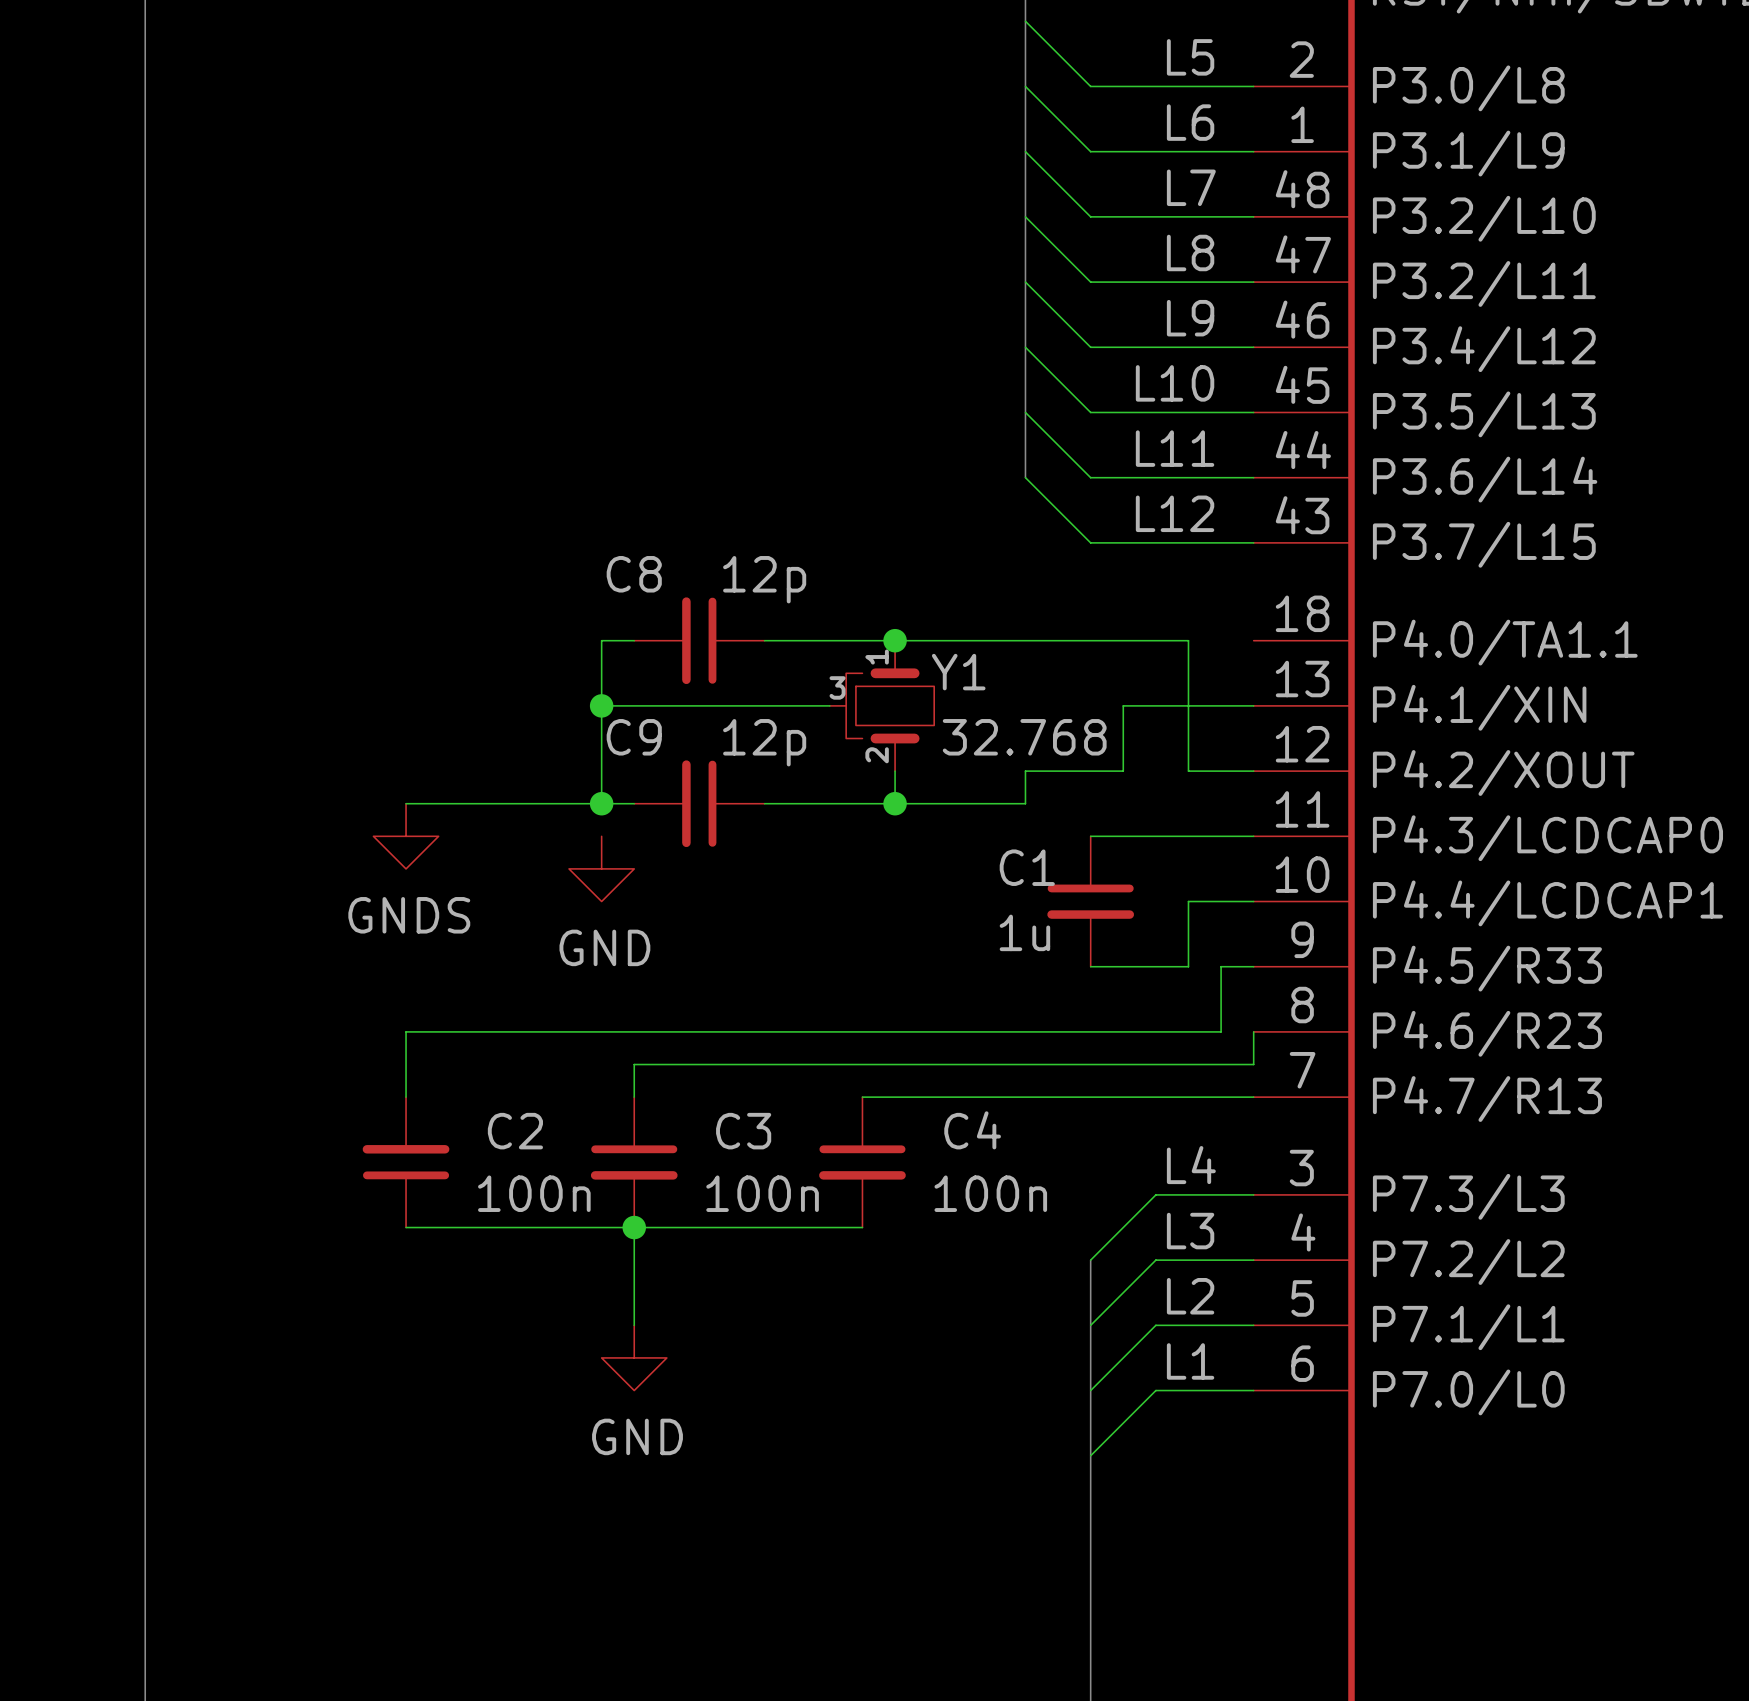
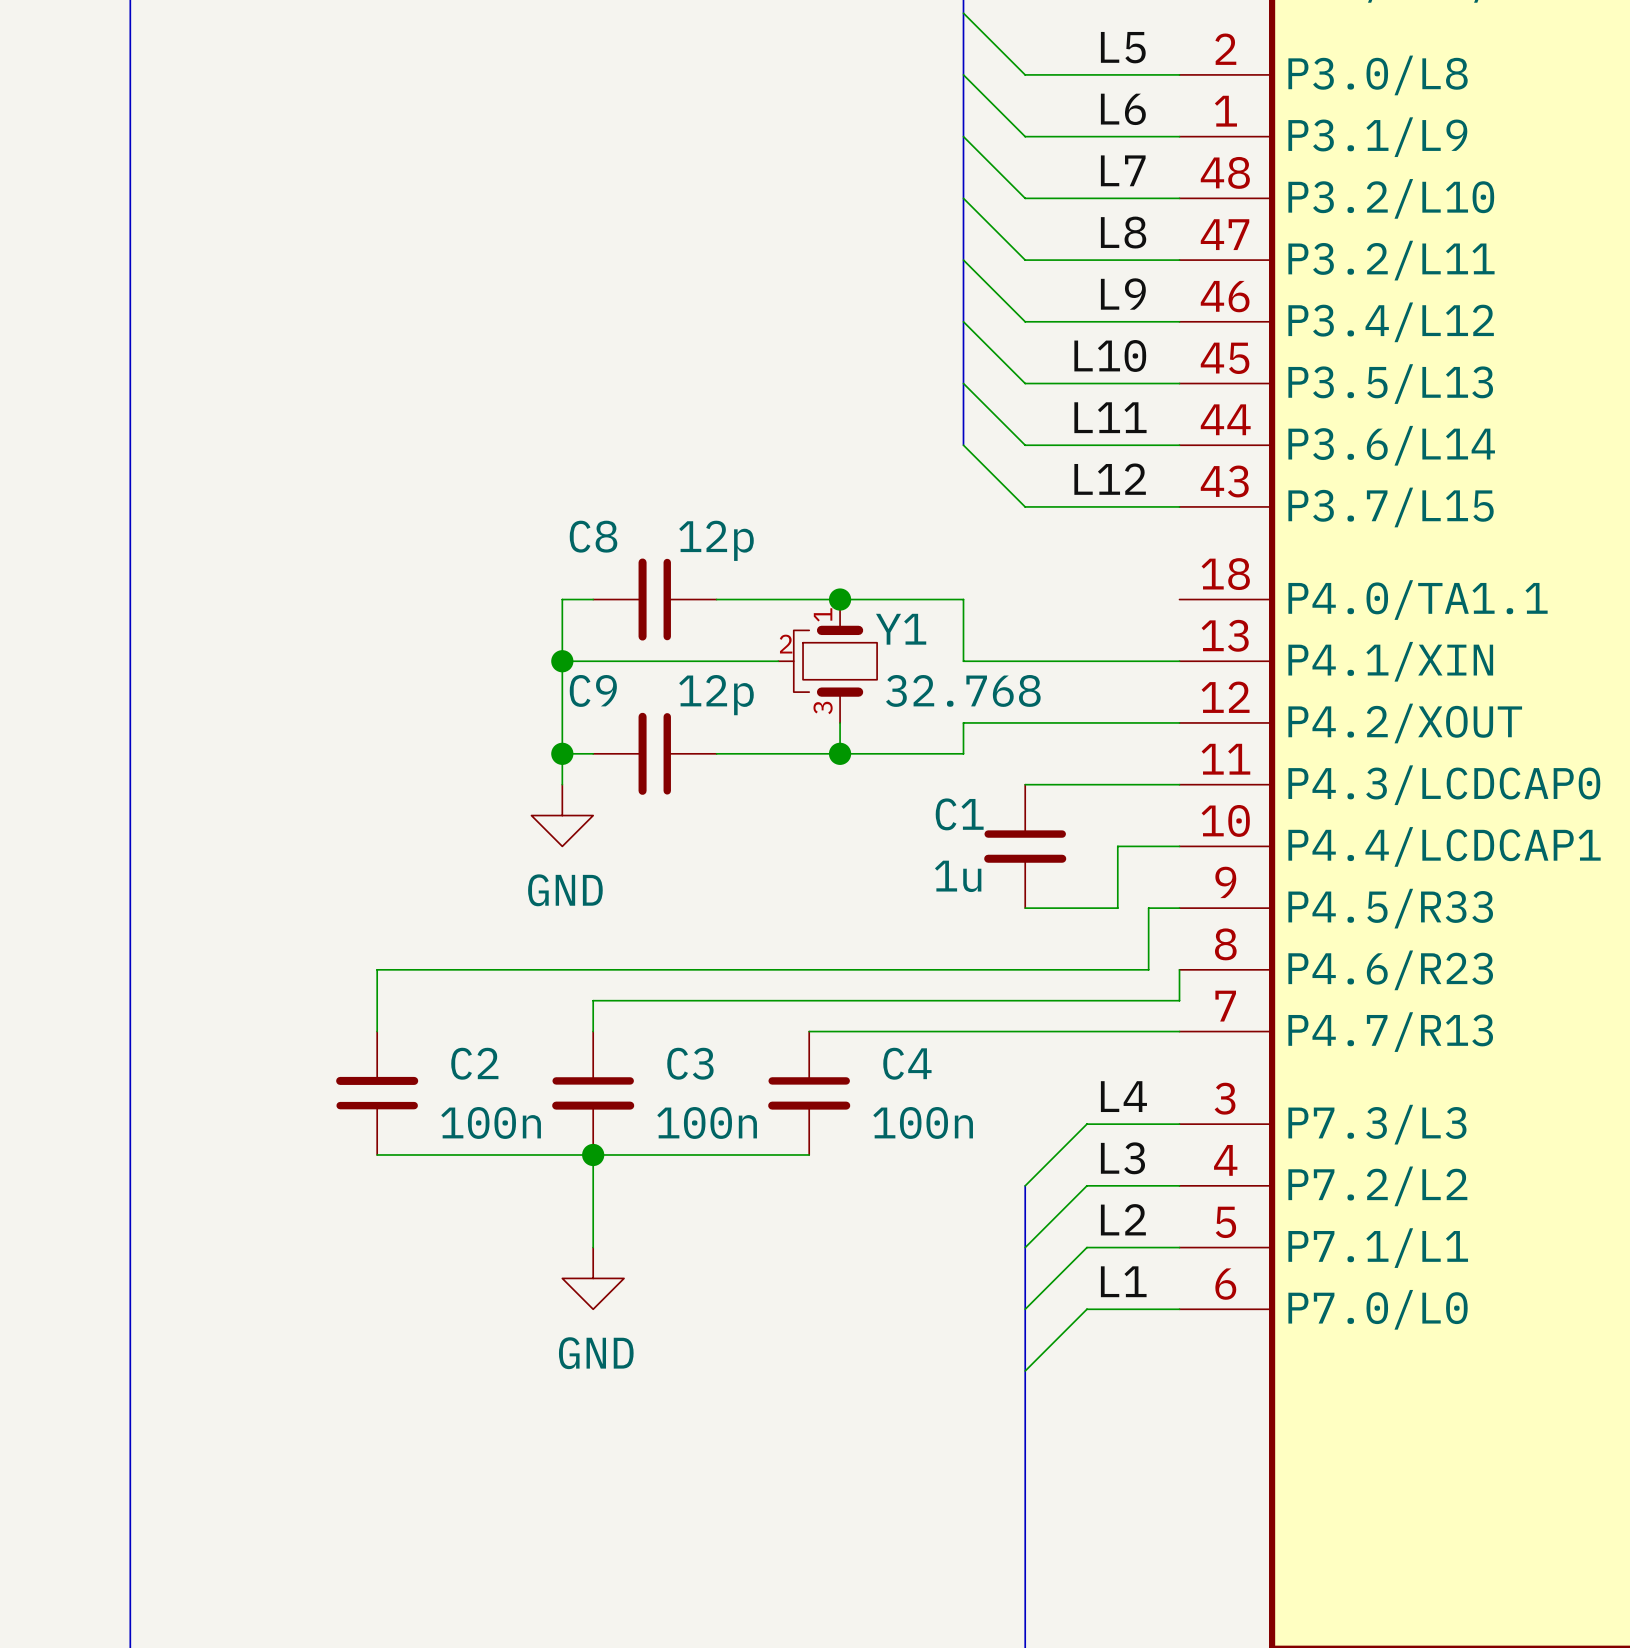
wire: (1025, 640) (1188, 640) (1188, 771) -> (963, 599) (963, 661) (1056, 661)
Y1 pin number: 3 (837, 687) -> 2 (786, 644)
wire: (1123, 705) (1123, 771) -> (1117, 722) (1056, 722)
Y1 pin number: 2 (877, 755) -> 3 (823, 707)
wire: (406, 803) (601, 803) -> (562, 784) (562, 753)
power symbol: GNDS (406, 836) -> none

